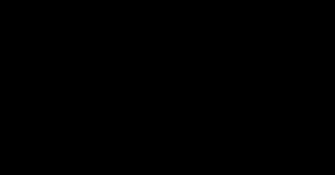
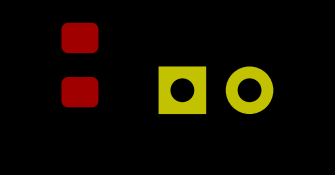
part: none -> (79, 65)
part: none -> (215, 90)

